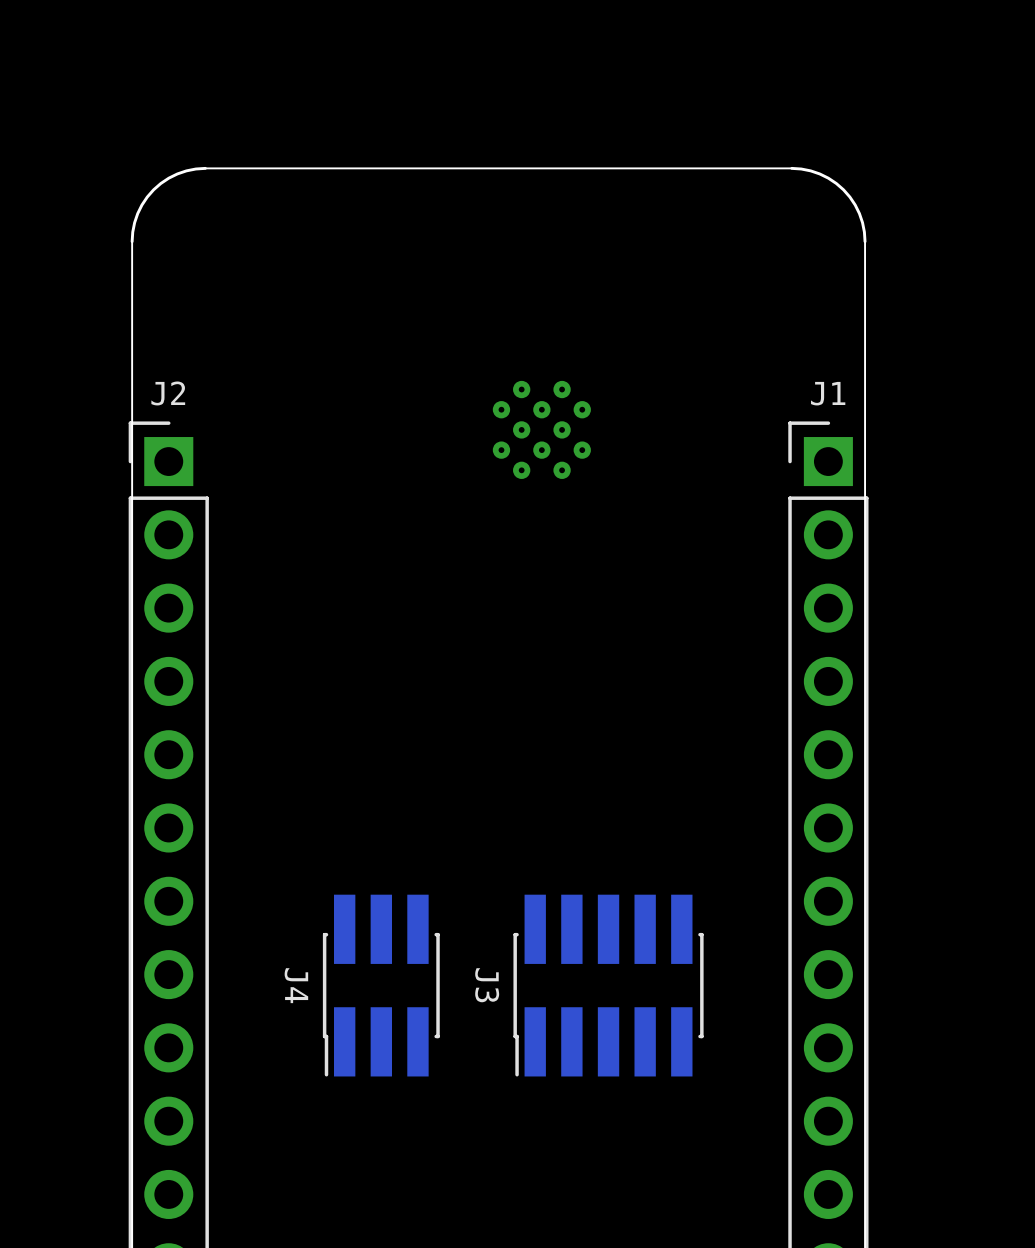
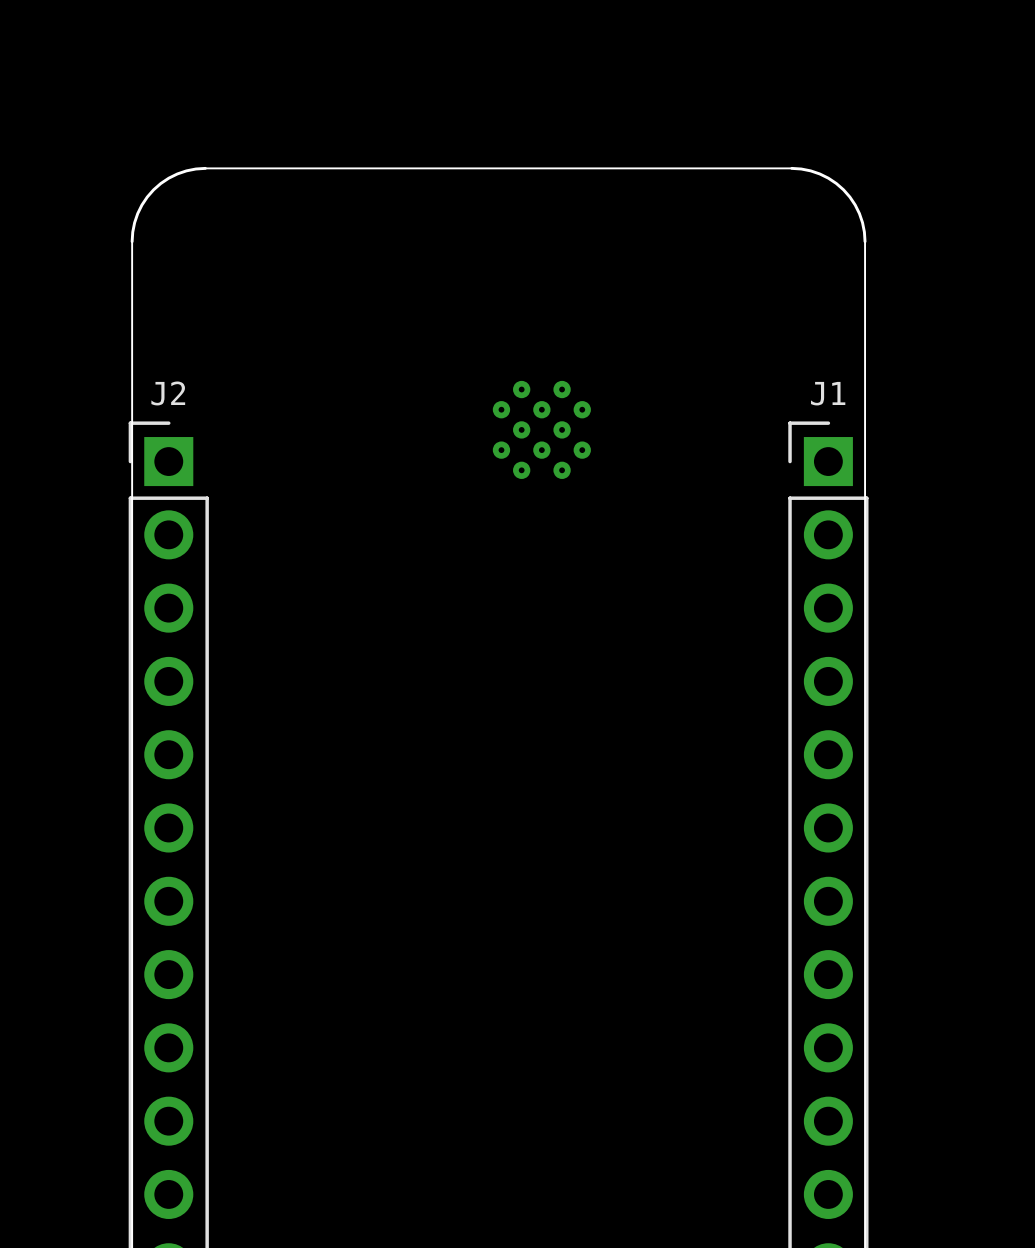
J4: (381, 985) -> none
J3: (608, 985) -> none

